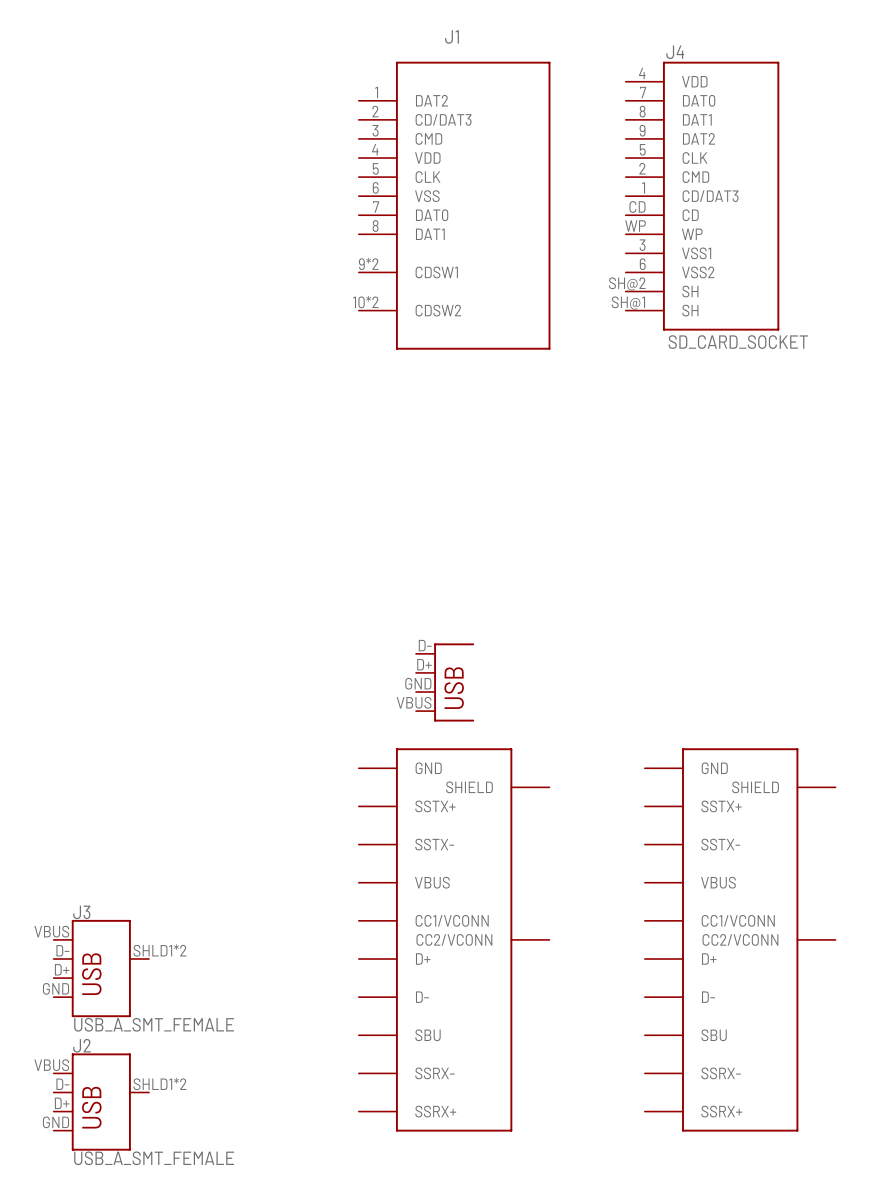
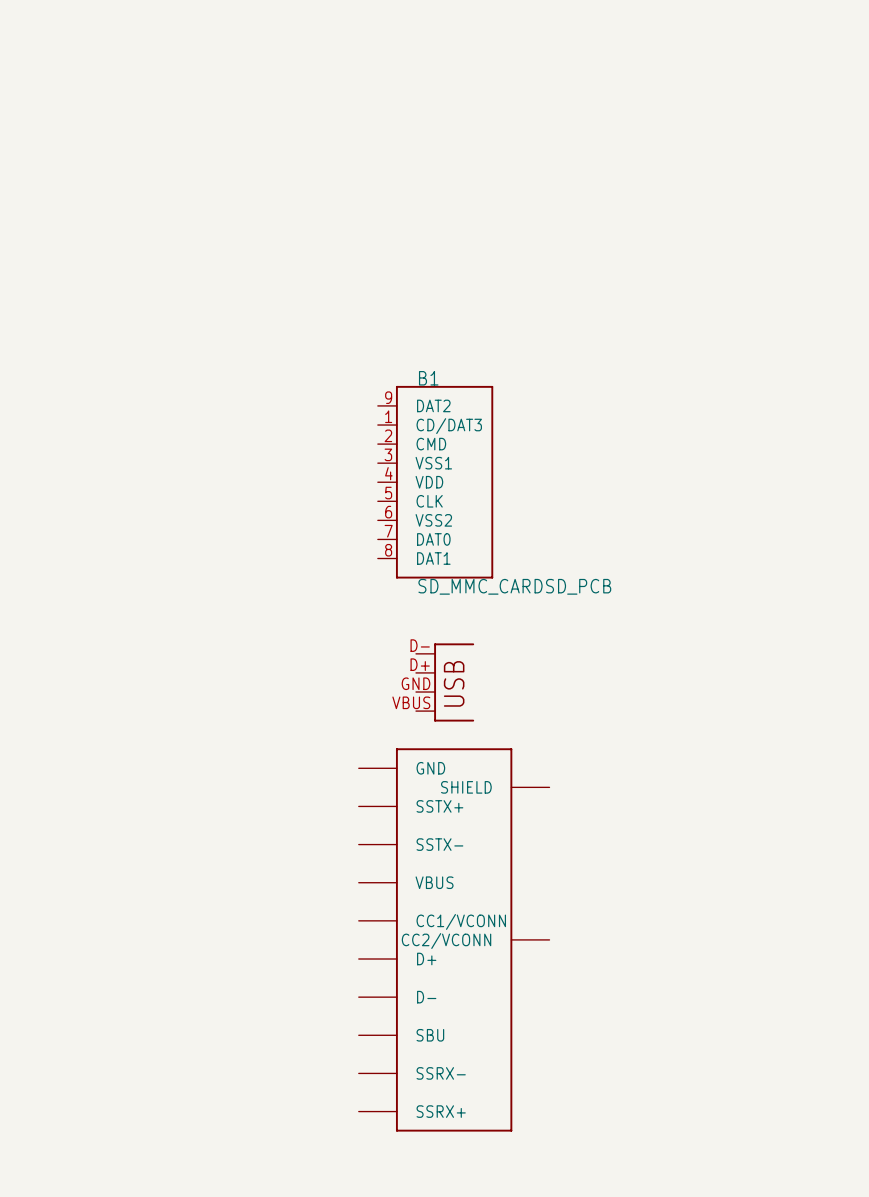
J4: SD_CARD_SOCKET (702, 196) -> none
J1: (454, 205) -> none
B1: none -> SD_MMC_CARDSD_PCB (435, 482)
part: (740, 939) -> none
J3: USB_A_SMT_FEMALE (101, 968) -> none
J2: USB_A_SMT_FEMALE (101, 1102) -> none

